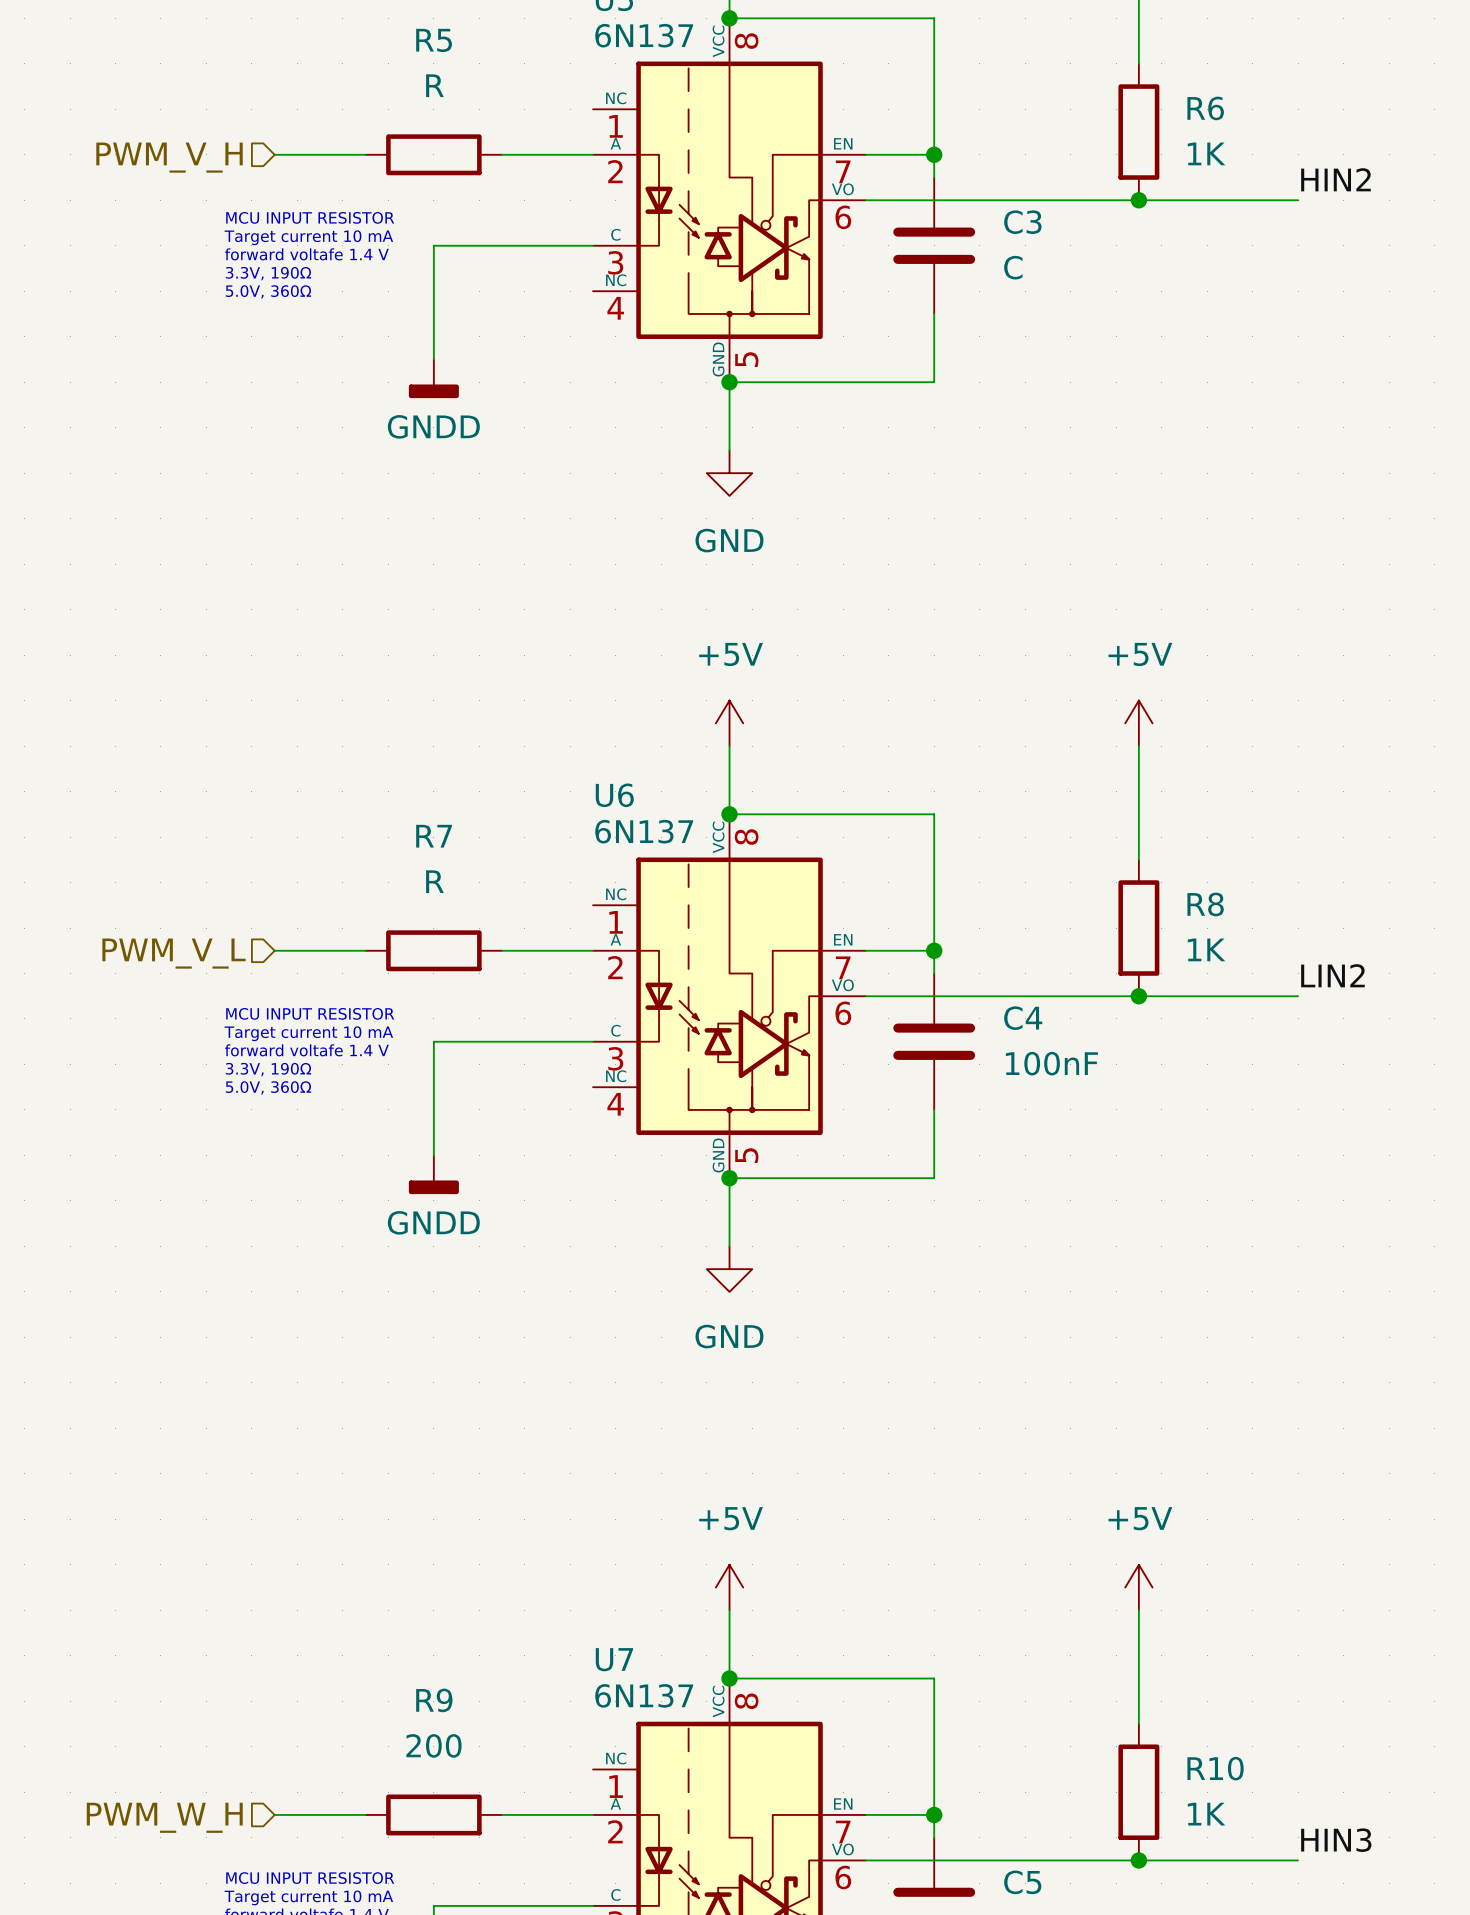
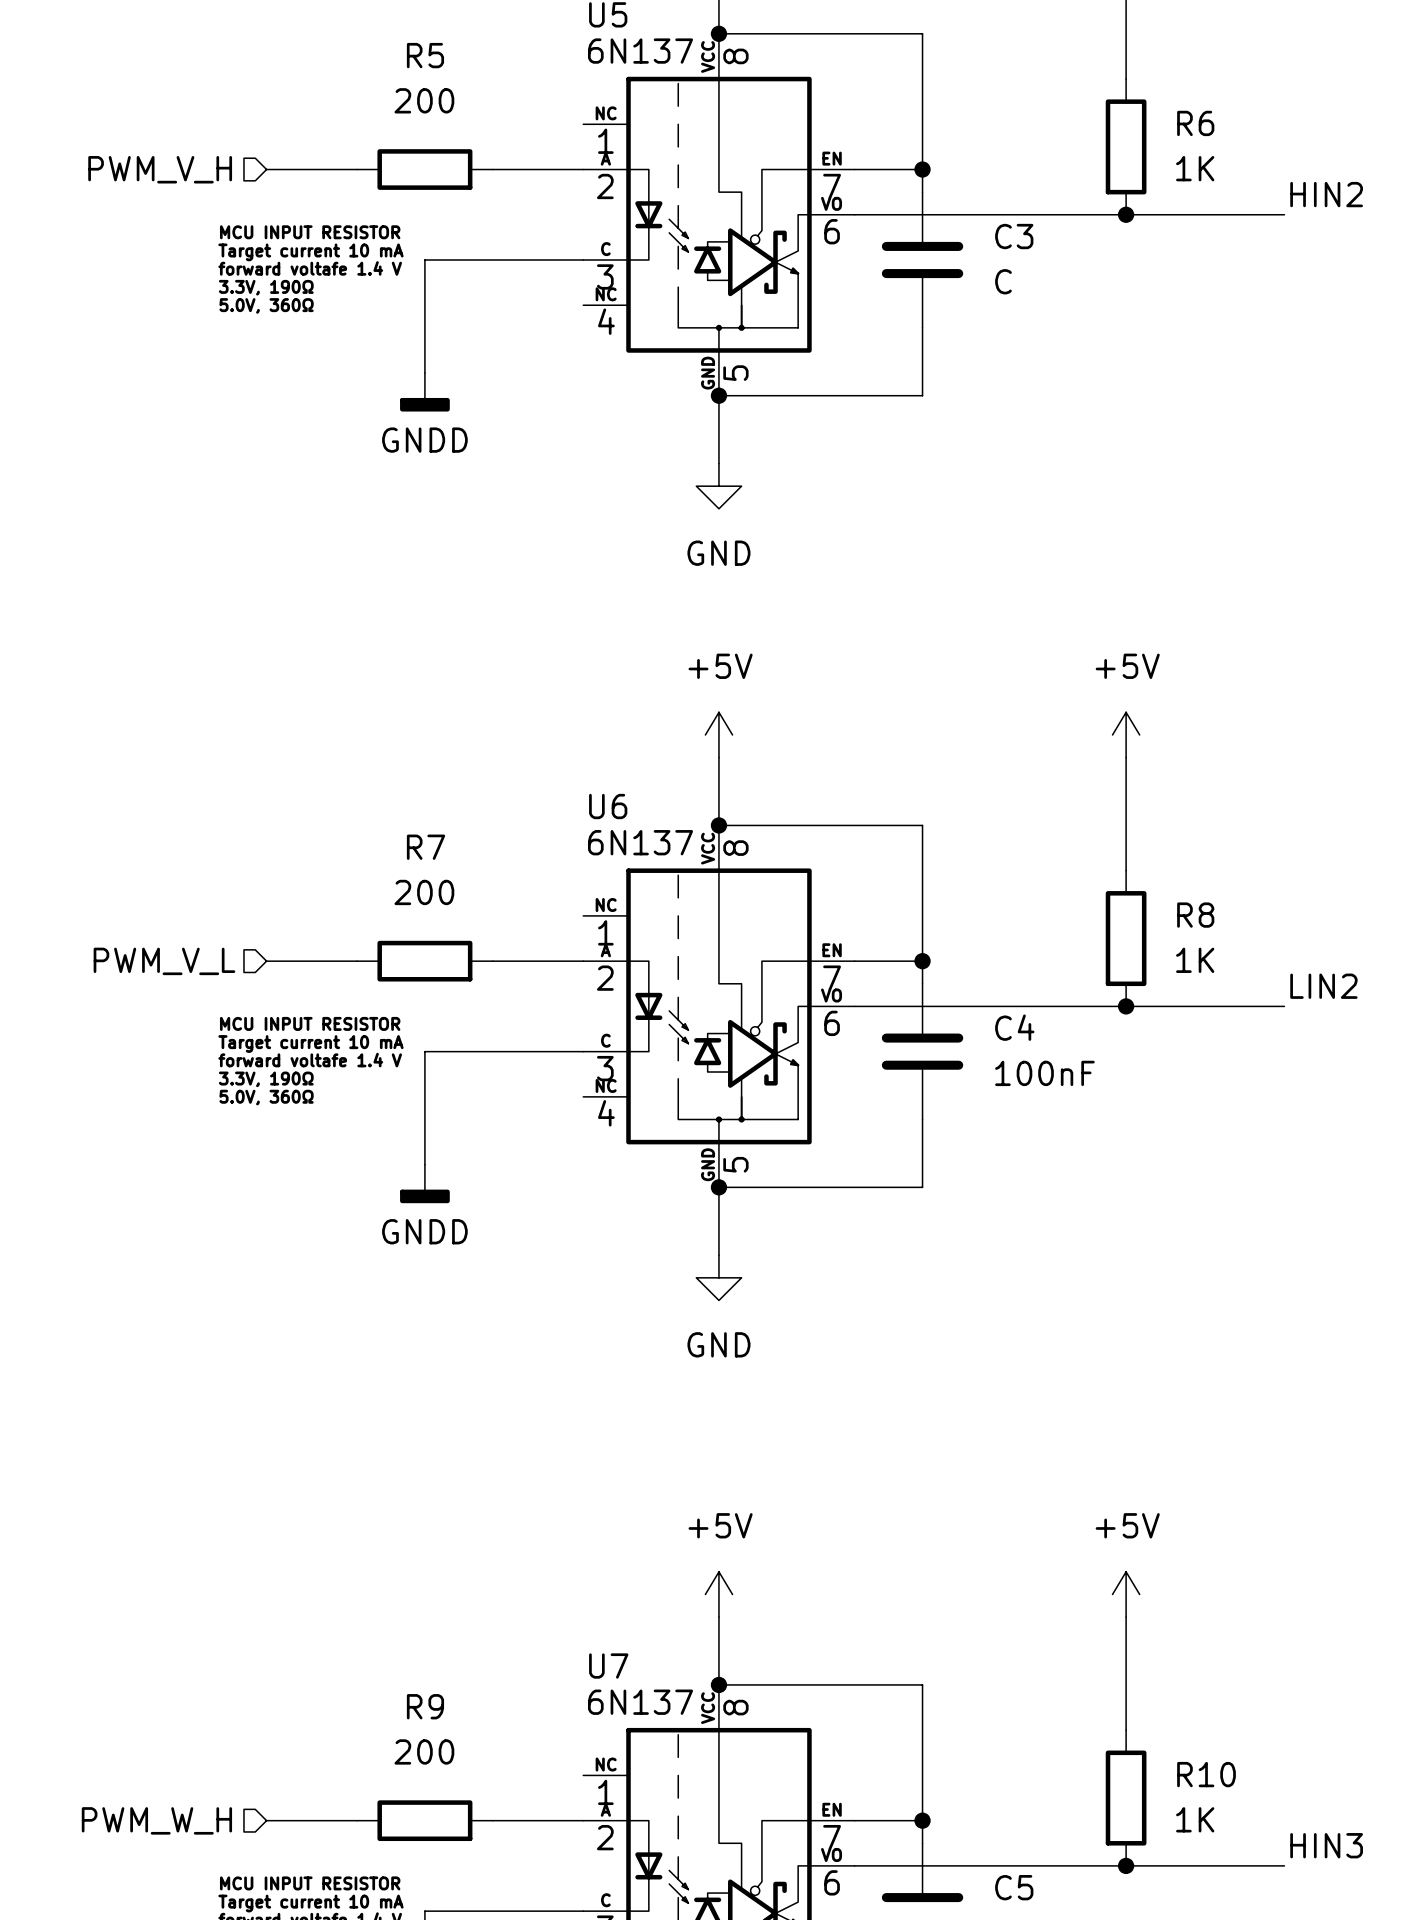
R5 value: R (434, 85) -> 200 (424, 100)
R7 value: R (434, 881) -> 200 (424, 892)

